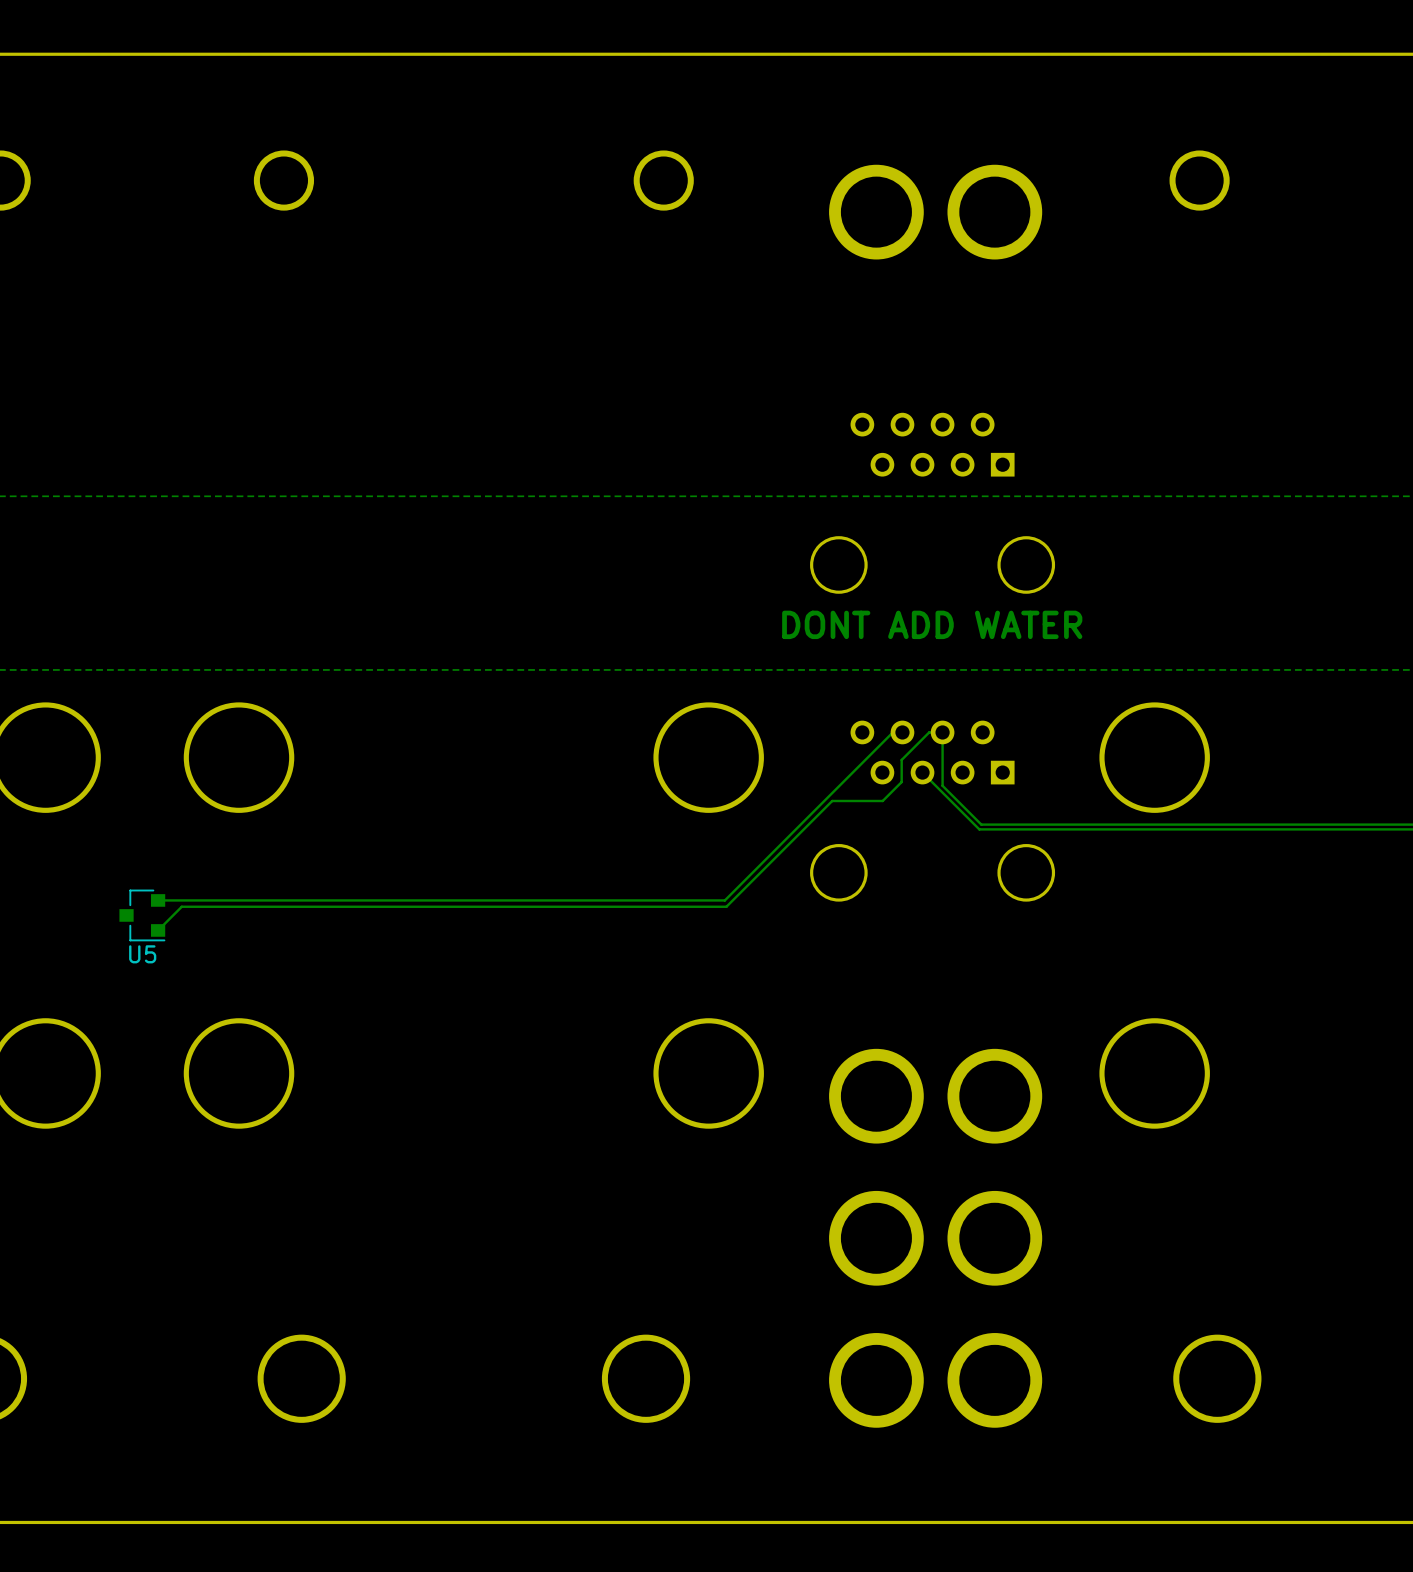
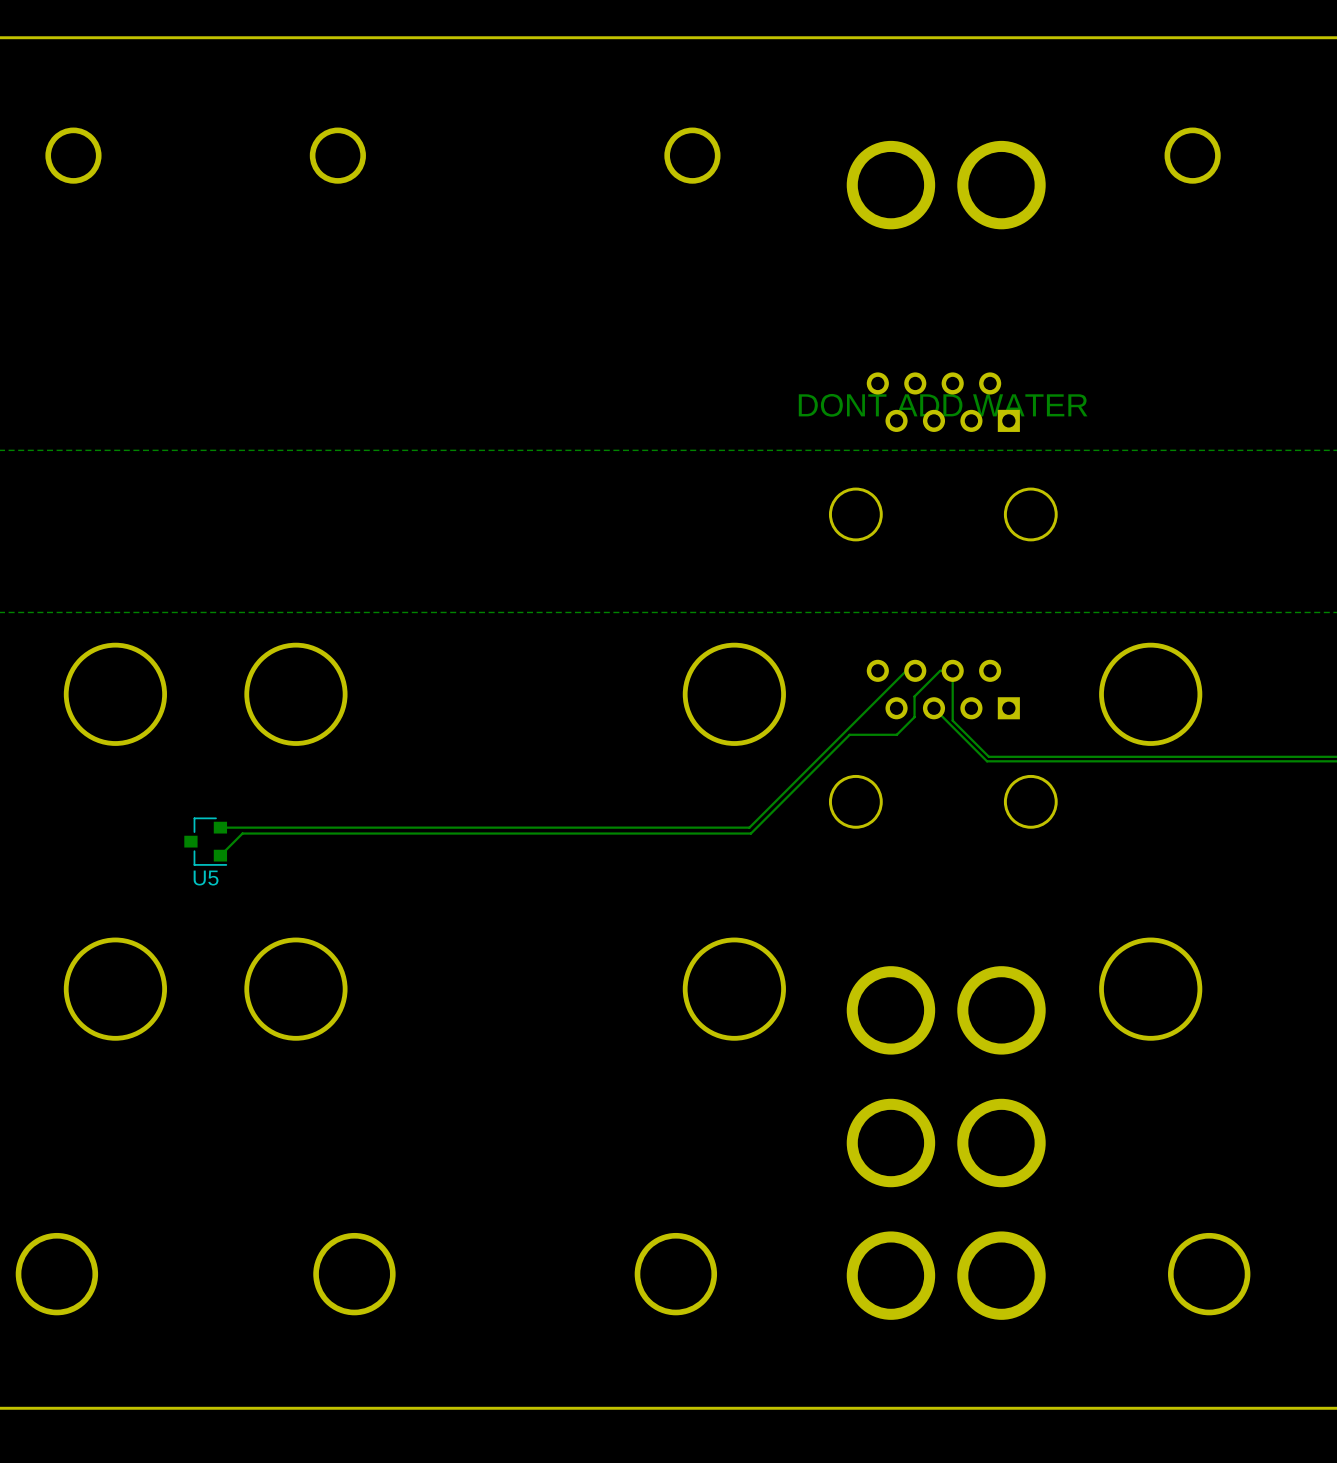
text position: DONT ADD WATER (932, 624) -> DONT ADD WATER (943, 405)

